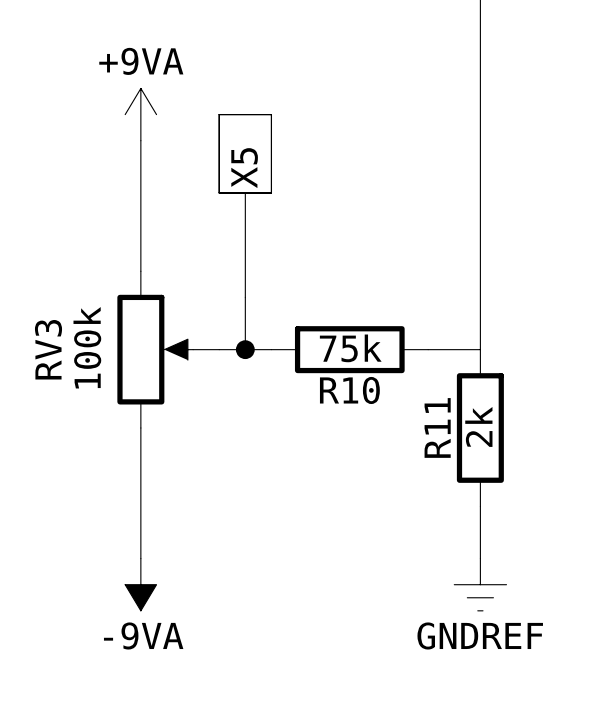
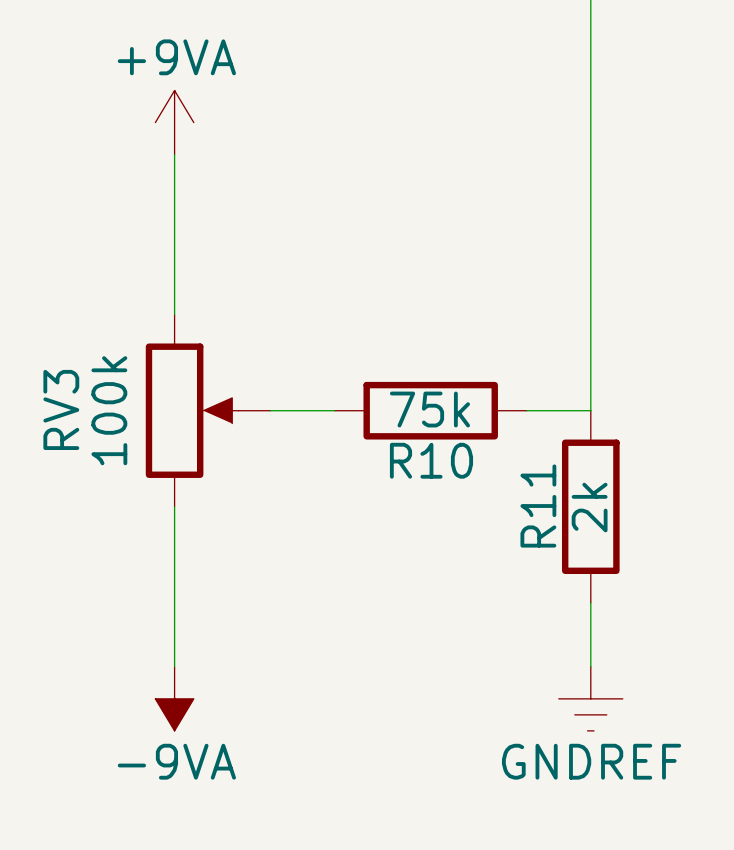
X5: (245, 206) -> none
wire: (245, 297) (245, 349) -> none
junction: (245, 349) -> none

